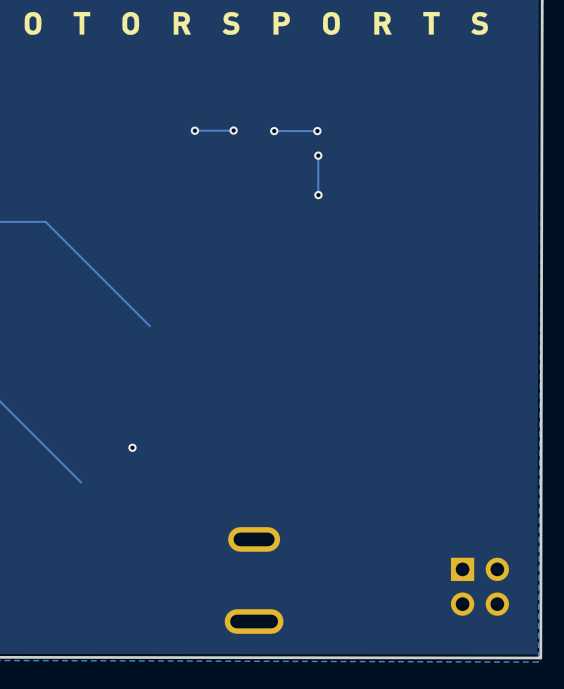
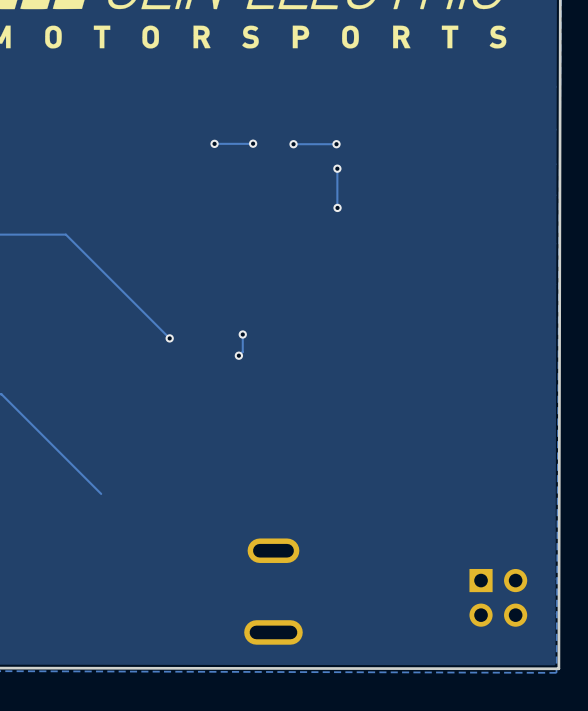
track: none -> (242, 334) (242, 351) (238, 355)
via: none -> (242, 334)
via: none -> (169, 338)
via: none -> (238, 355)
via: (132, 447) -> none

